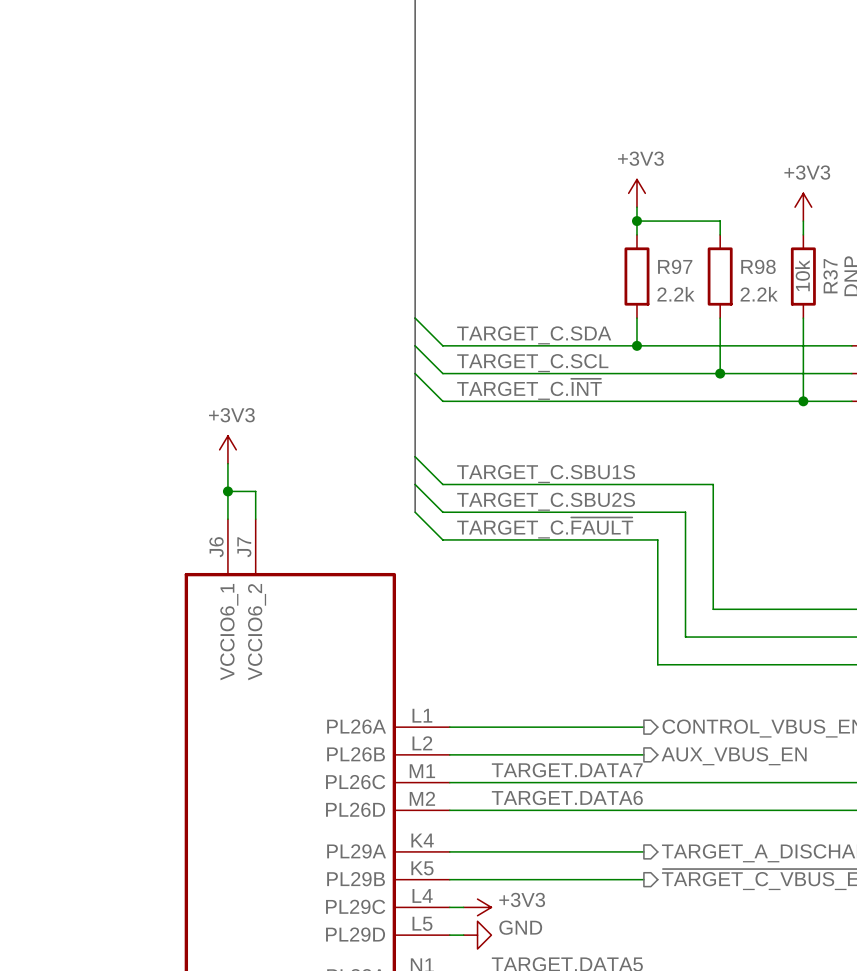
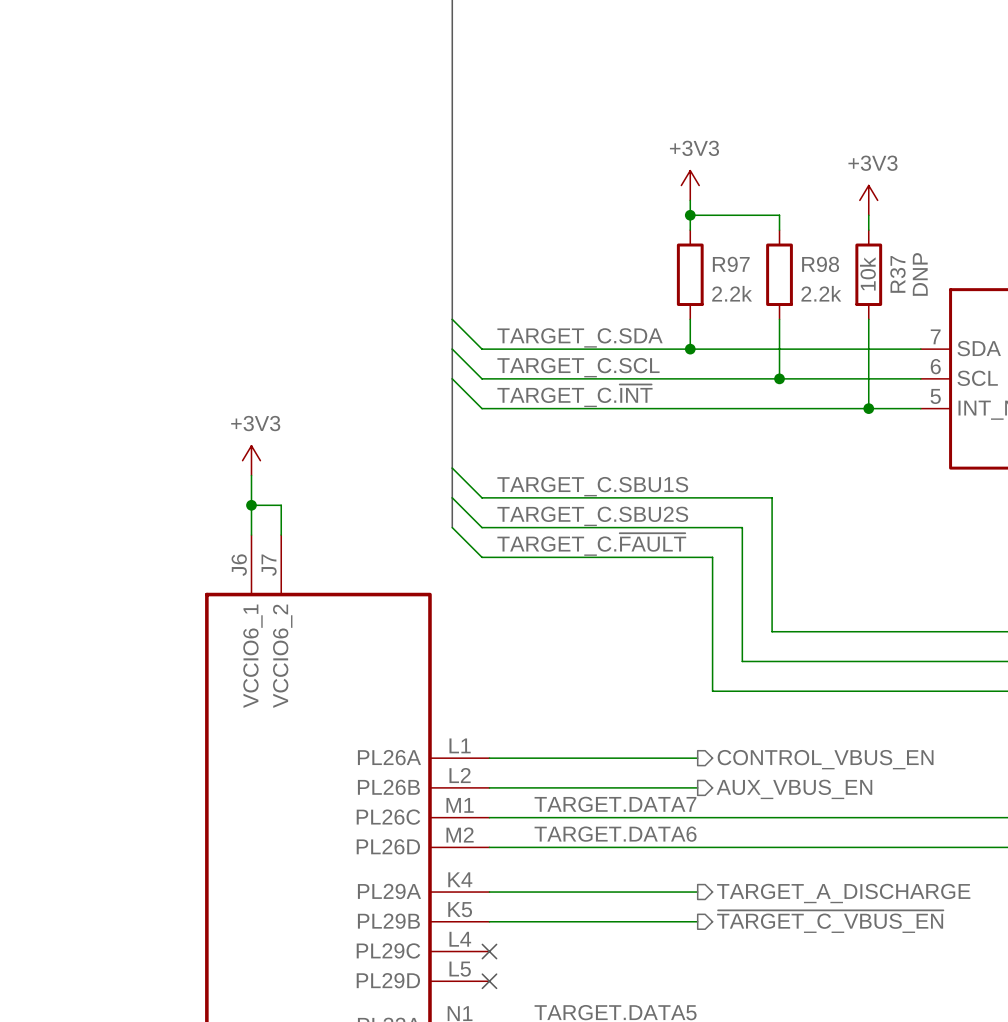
wire: (449, 907) (463, 907) -> none
no-connect mark: none -> (489, 951)
power symbol: +3V3 (477, 907) -> none
wire: (449, 935) (463, 935) -> none
no-connect mark: none -> (489, 981)
power symbol: GND (477, 935) -> none

